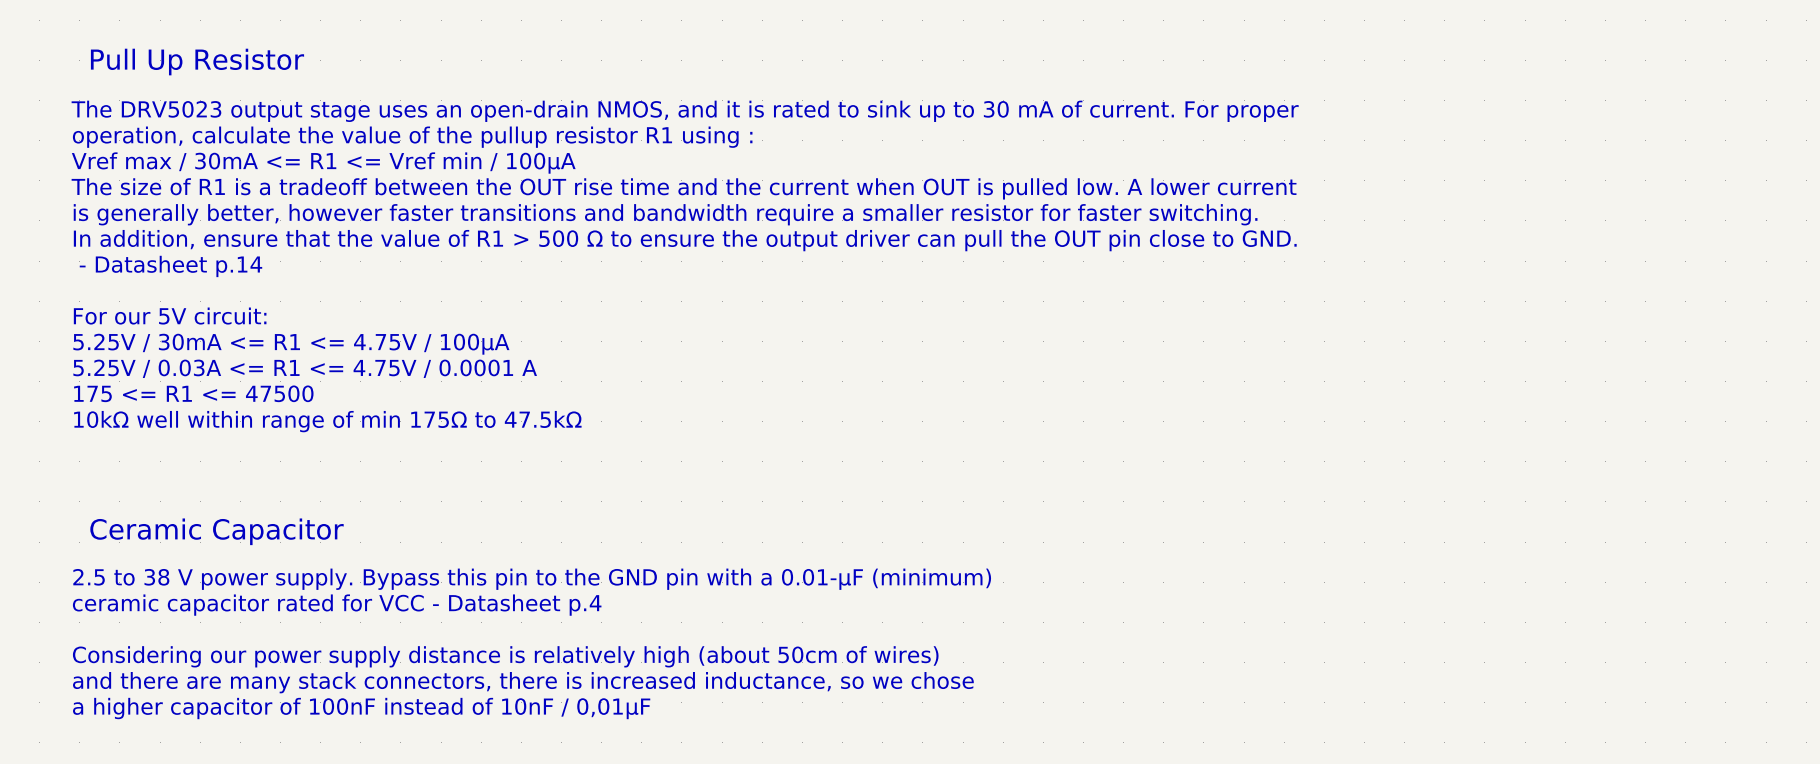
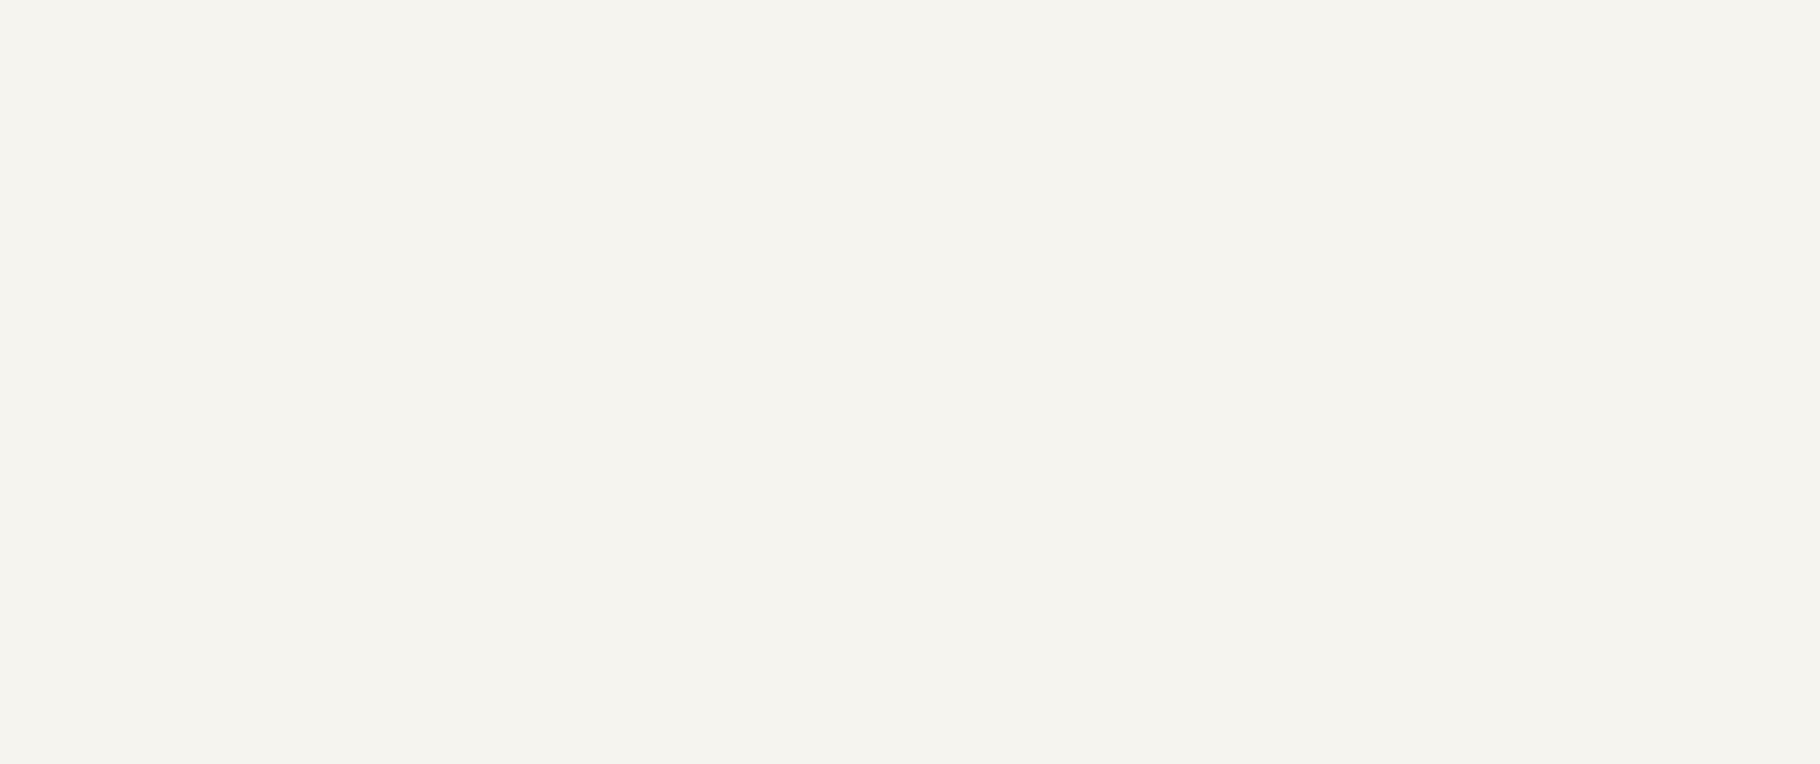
text: Pull Up Resistor (197, 62) -> none
text: The DRV5023 output stage uses an open-drain NMOS, and it is rated to sink up to 30 mA of current. For proper (685, 111) -> none
text: operation, calculate the value of the pullup resistor R1 using : (412, 137) -> none
text: Vref max / 30mA <= R1 <= Vref min / 100μA (323, 163) -> none
text: The size of R1 is a tradeoff between the OUT rise time and the current when OUT is pulled low. A lower current (684, 188) -> none
text: is generally better, however faster transitions and bandwidth require a smaller resistor for faster switching. (665, 214) -> none
text: In addition, ensure that the value of R1 > 500 Ω to ensure the output driver can pull the OUT pin close to GND. (685, 240) -> none
text: - Datasheet p.14 (170, 266) -> none
text: For our 5V circuit: (170, 316) -> none
text: 5.25V / 30mA <= R1 <= 4.75V / 100μA (291, 344) -> none
text: 5.25V / 0.03A <= R1 <= 4.75V / 0.0001 A (305, 368) -> none
text: 175 <= R1 <= 47500 (193, 393) -> none
text: 10kΩ well within range of min 175Ω to 47.5kΩ (327, 421) -> none
text: Ceramic Capacitor (216, 531) -> none
text: 2.5 to 38 V power supply. Bypass this pin to the GND pin with a 0.01-μF (minimum) (532, 579) -> none
text: ceramic capacitor rated for VCC - Datasheet p.4 (337, 605) -> none
text: Considering our power supply distance is relatively high (about 50cm of wires) (505, 656) -> none
text: and there are many stack connectors, there is increased inductance, so we chose (523, 682) -> none
text: a higher capacitor of 100nF instead of 10nF / 0,01μF (361, 708) -> none

